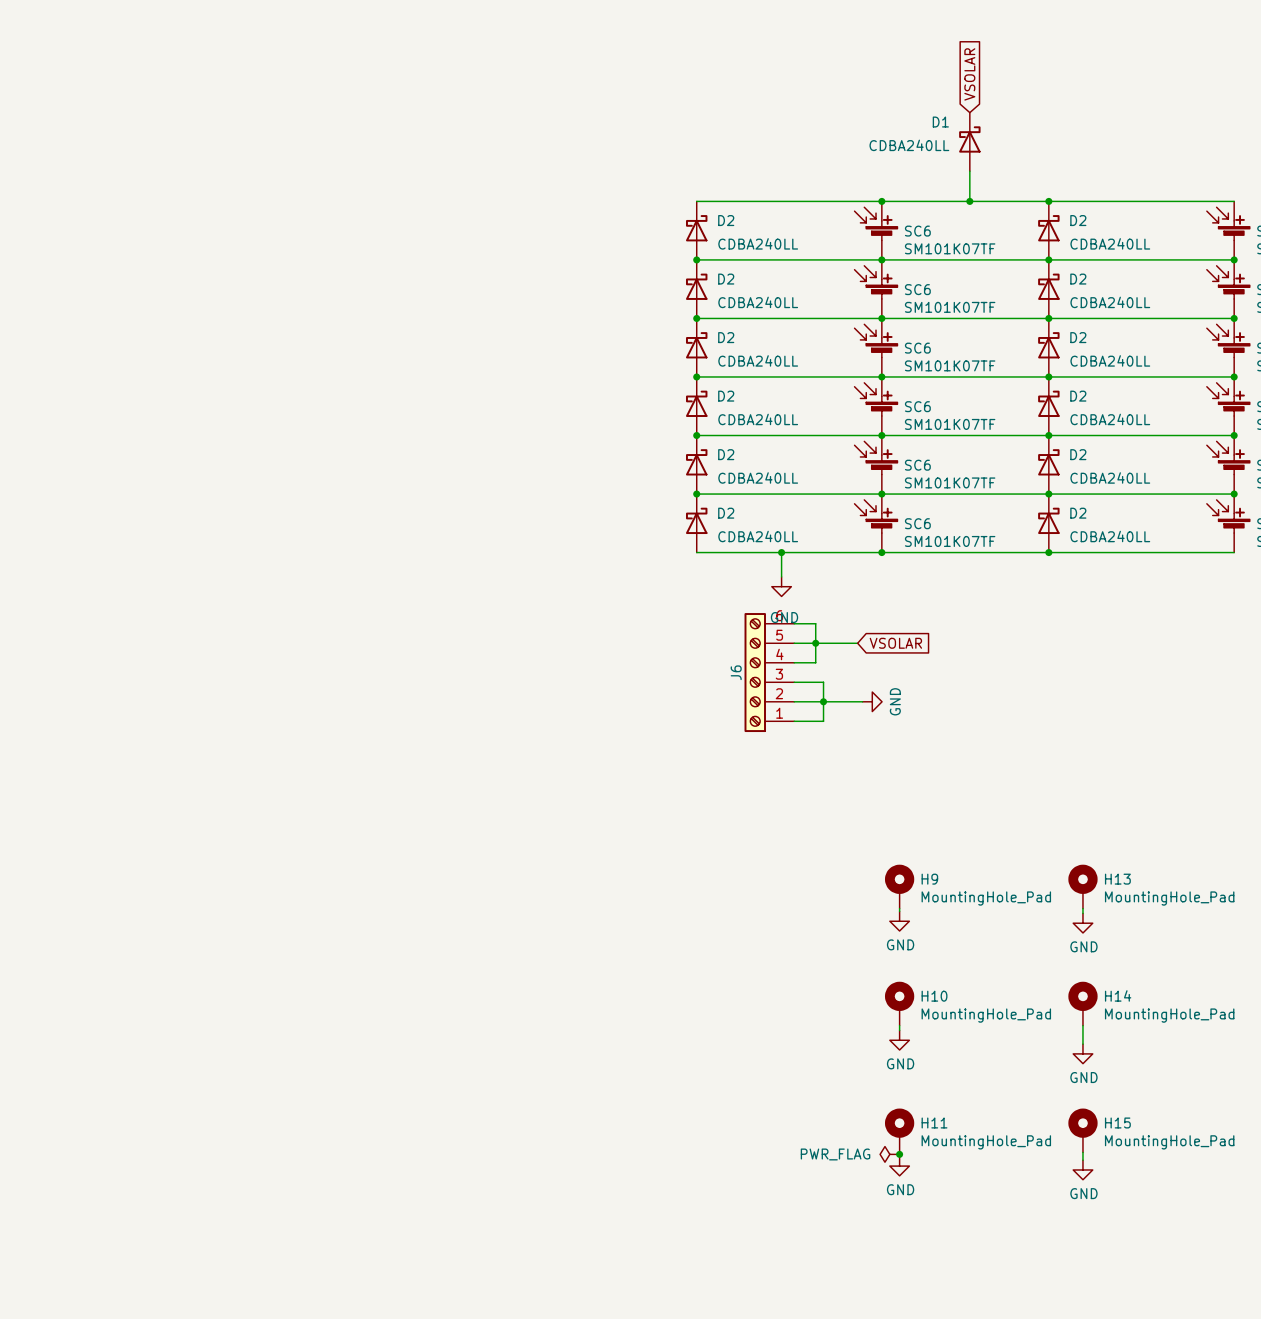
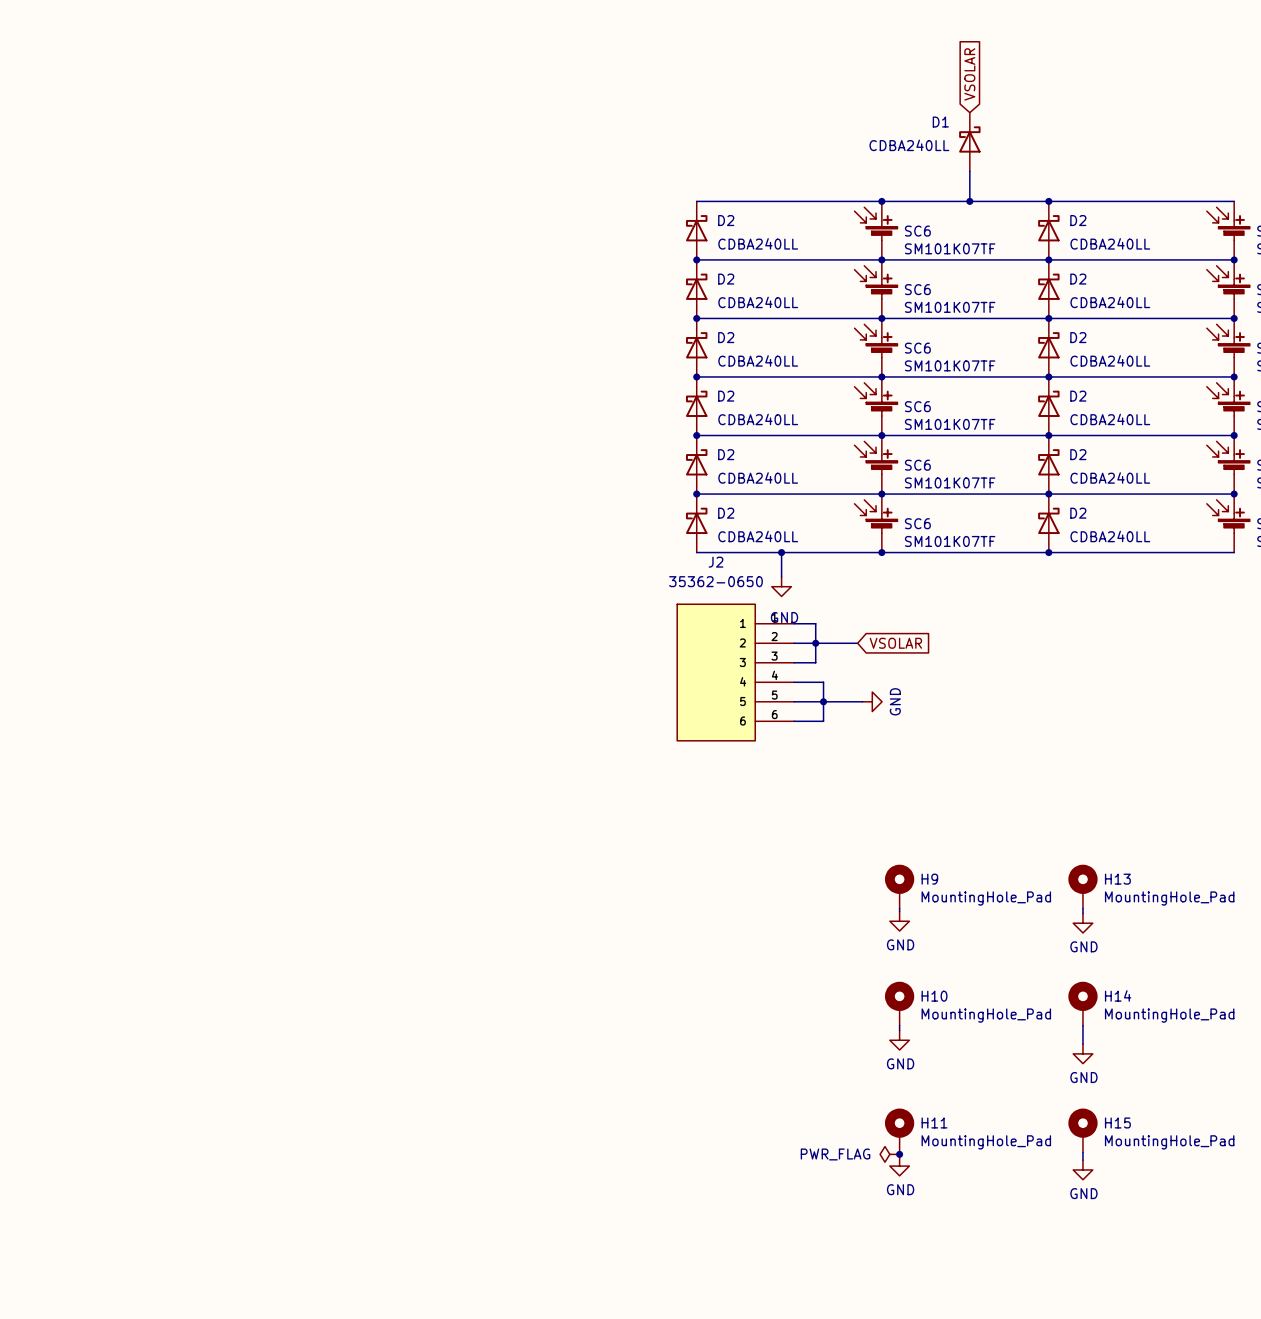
J2: none -> 35362-0650 (735, 672)
J6: (769, 672) -> none

